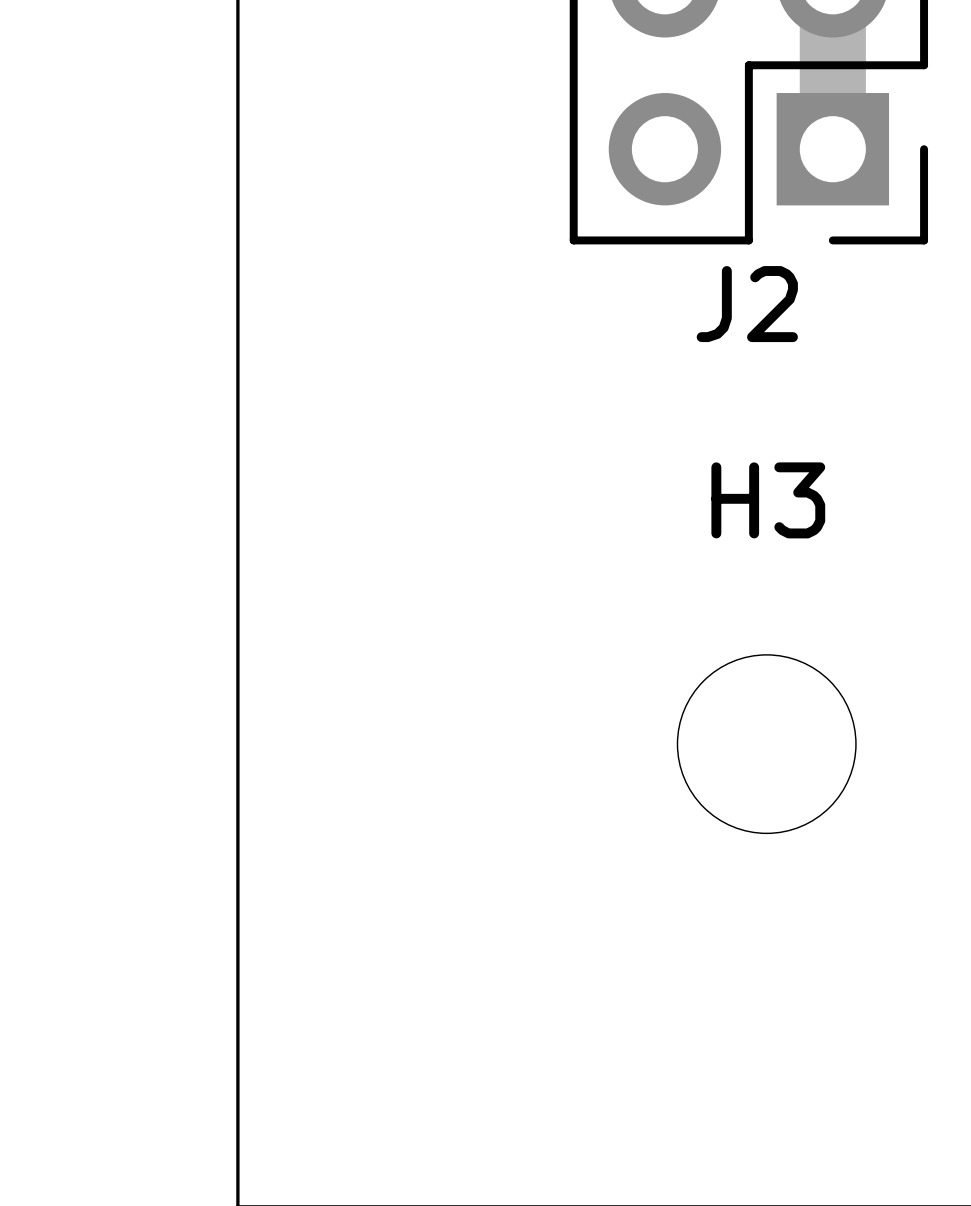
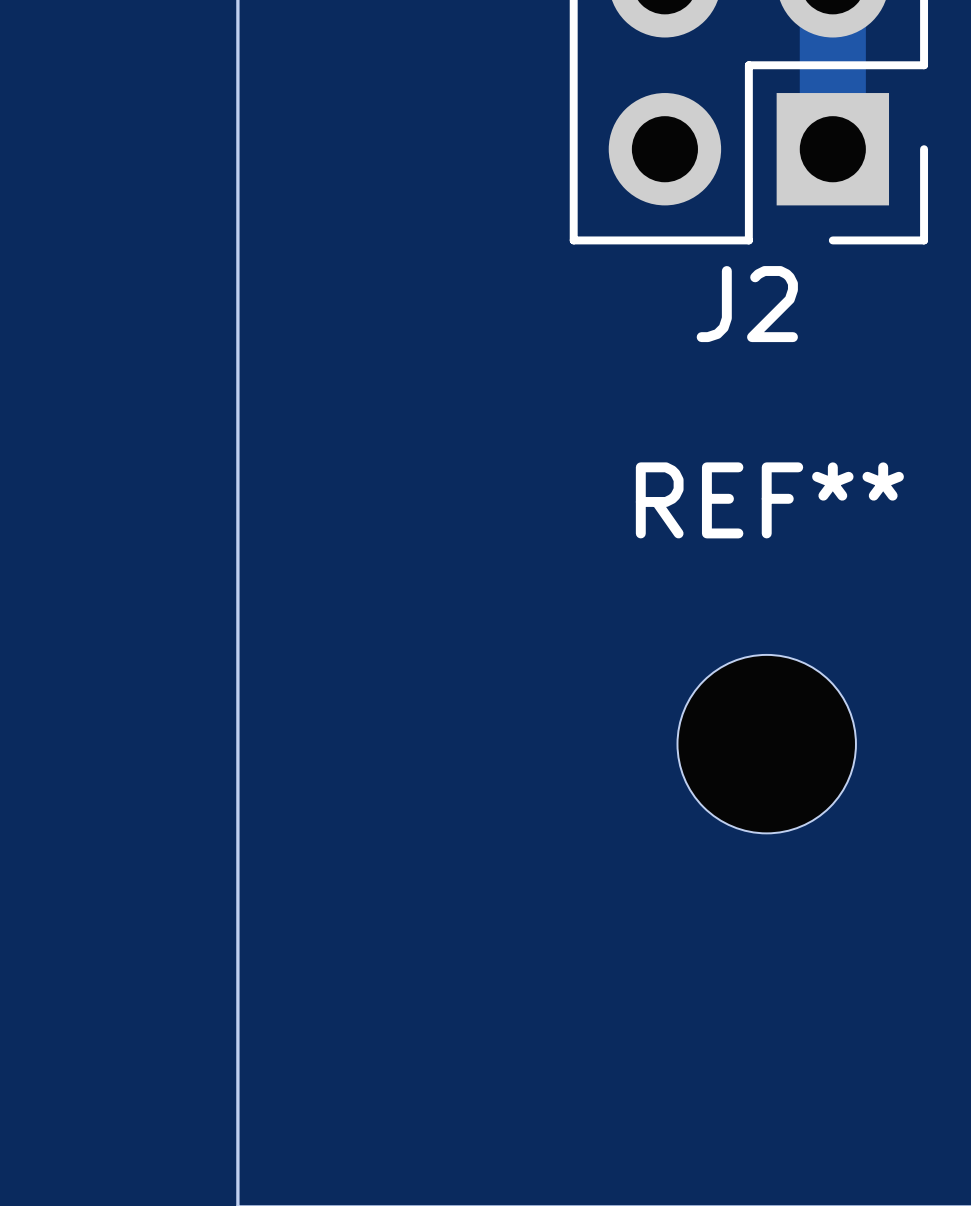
H3 name: H3 (768, 500) -> REF** (769, 500)

